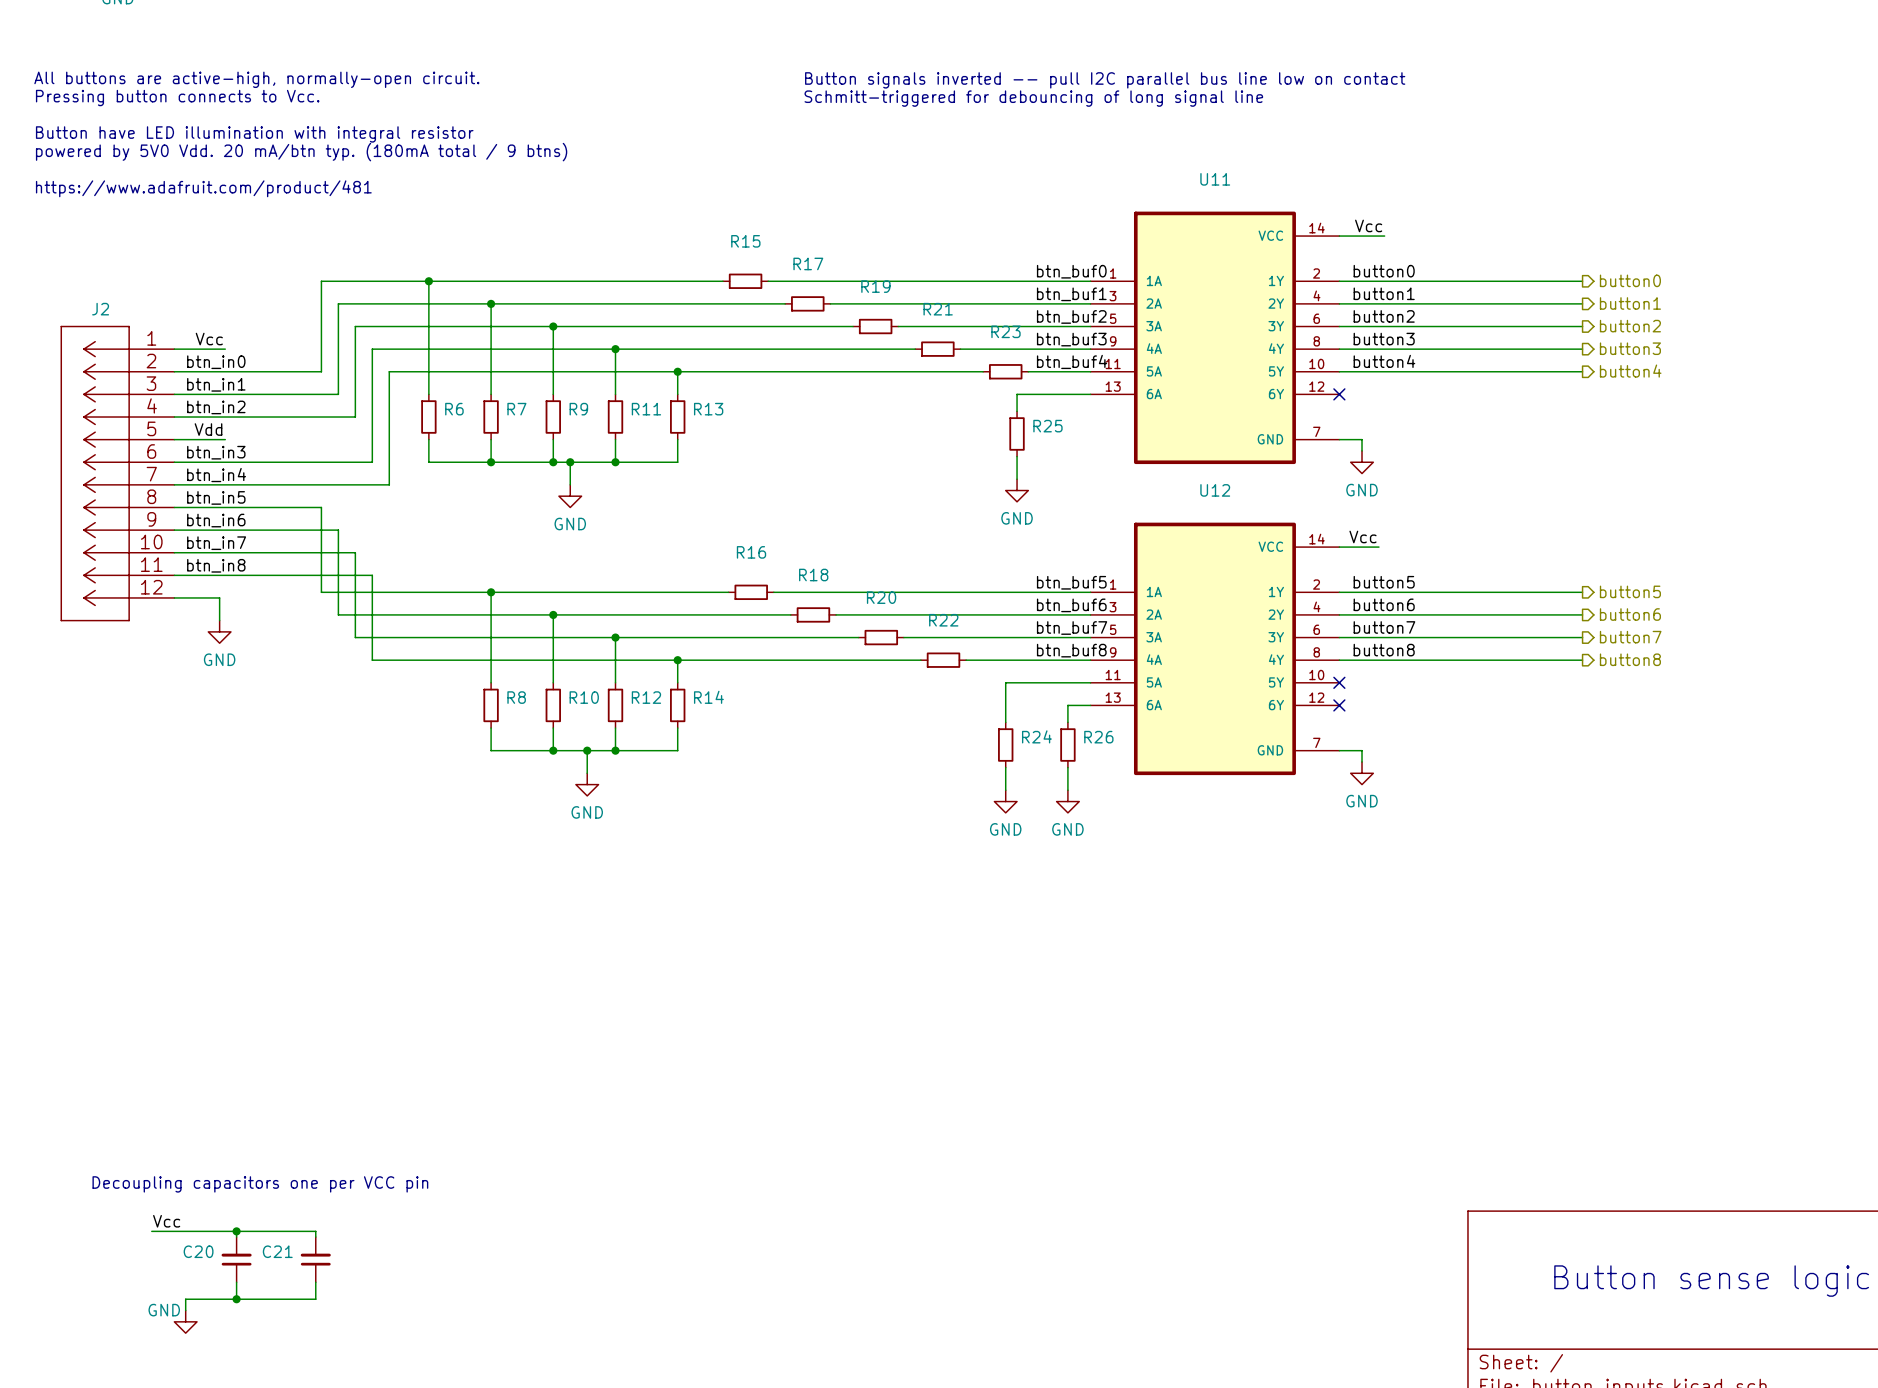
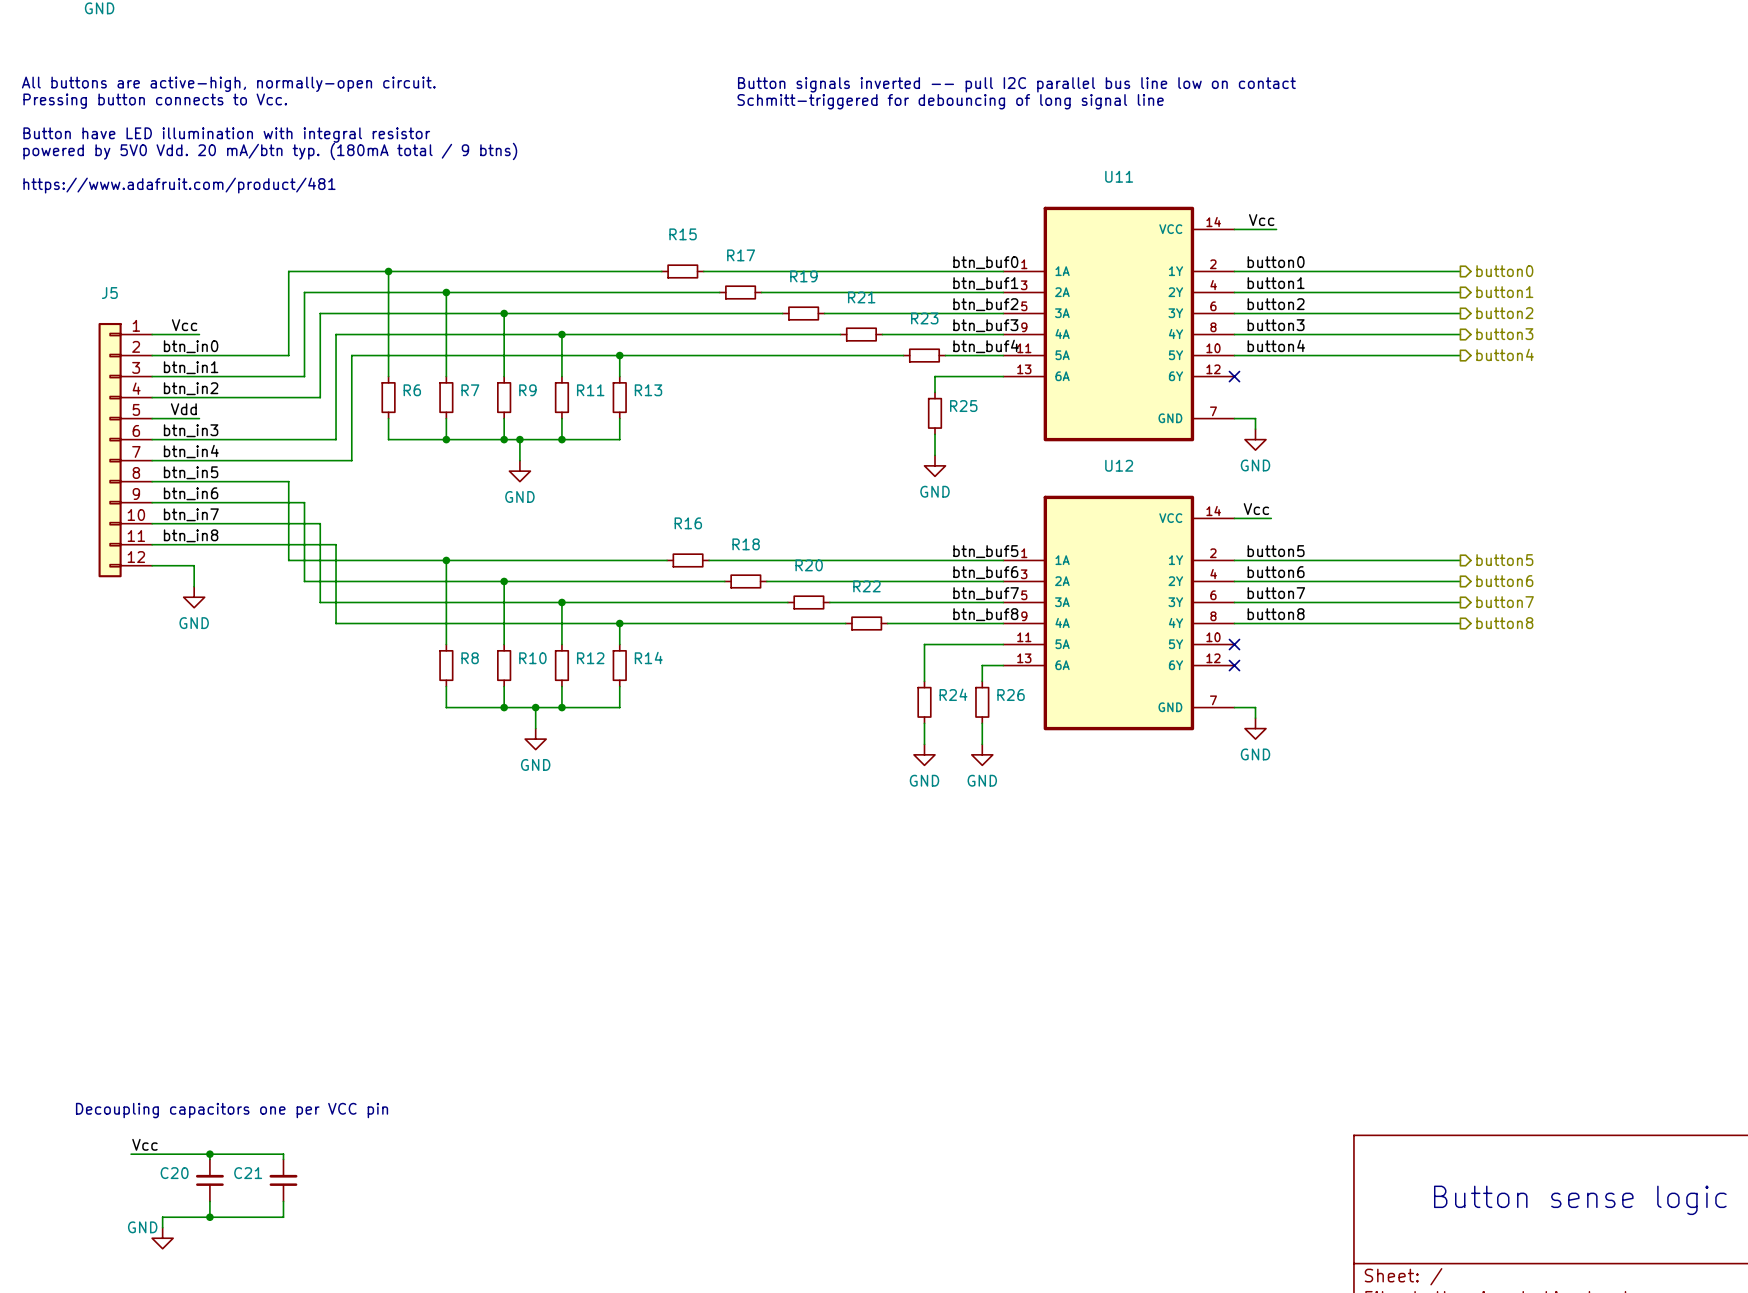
J2: (117, 473) -> none
J5: none -> (125, 450)

